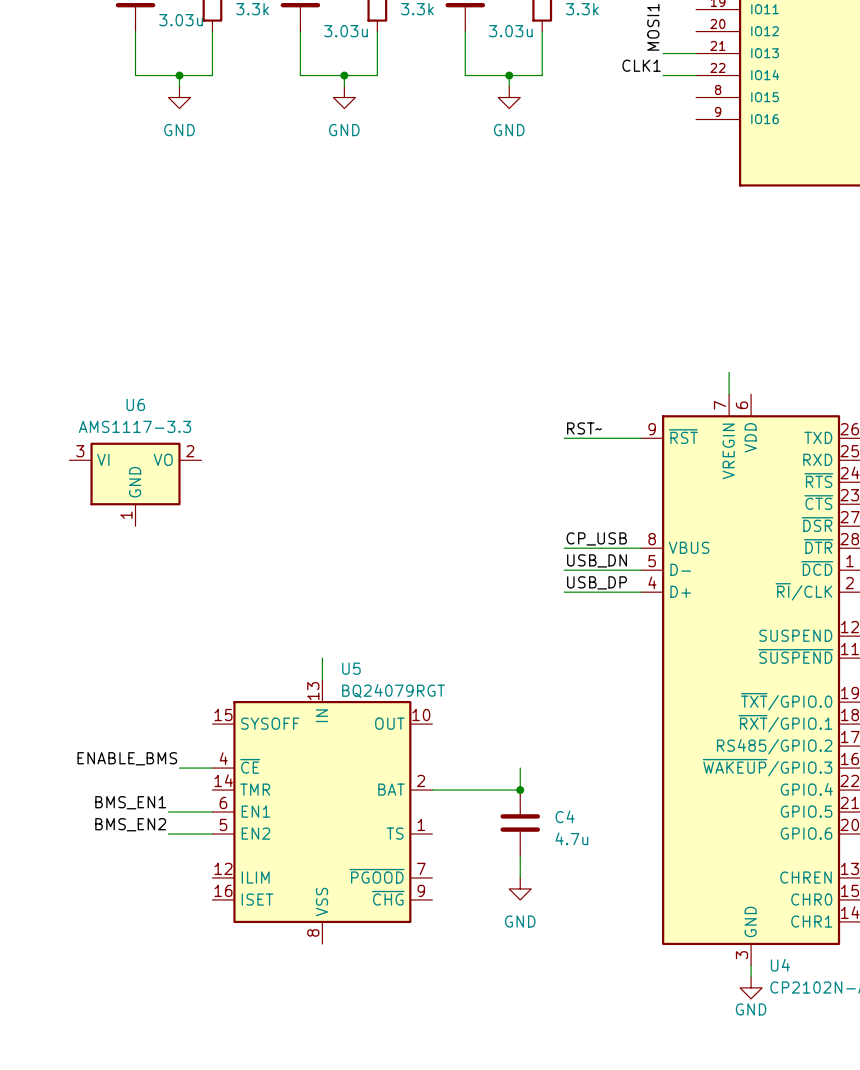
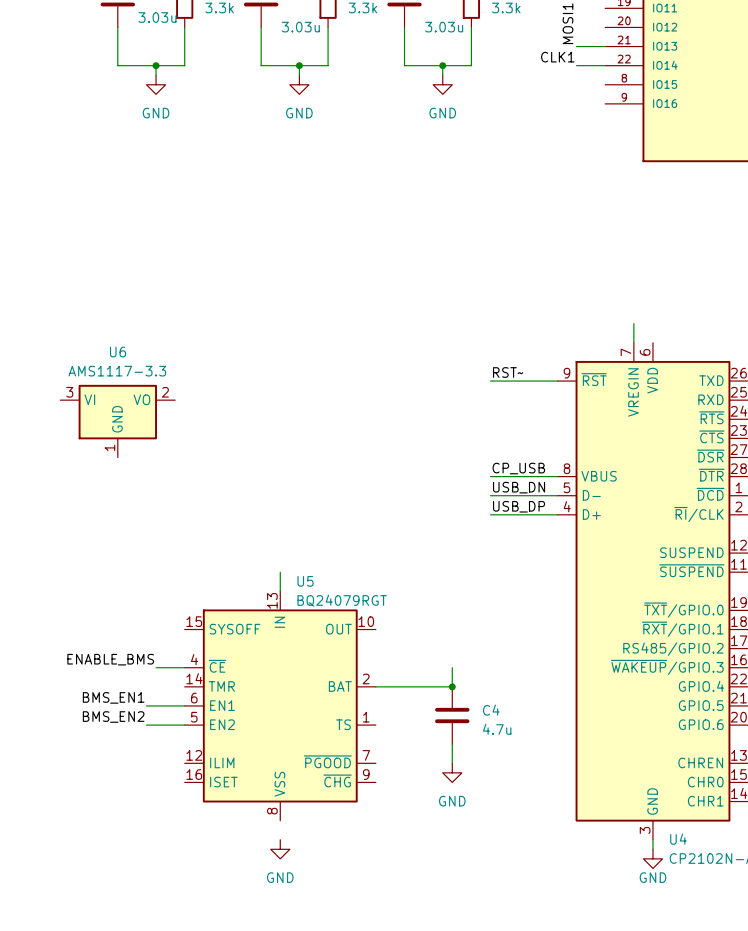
power symbol: none -> GND (280, 849)

